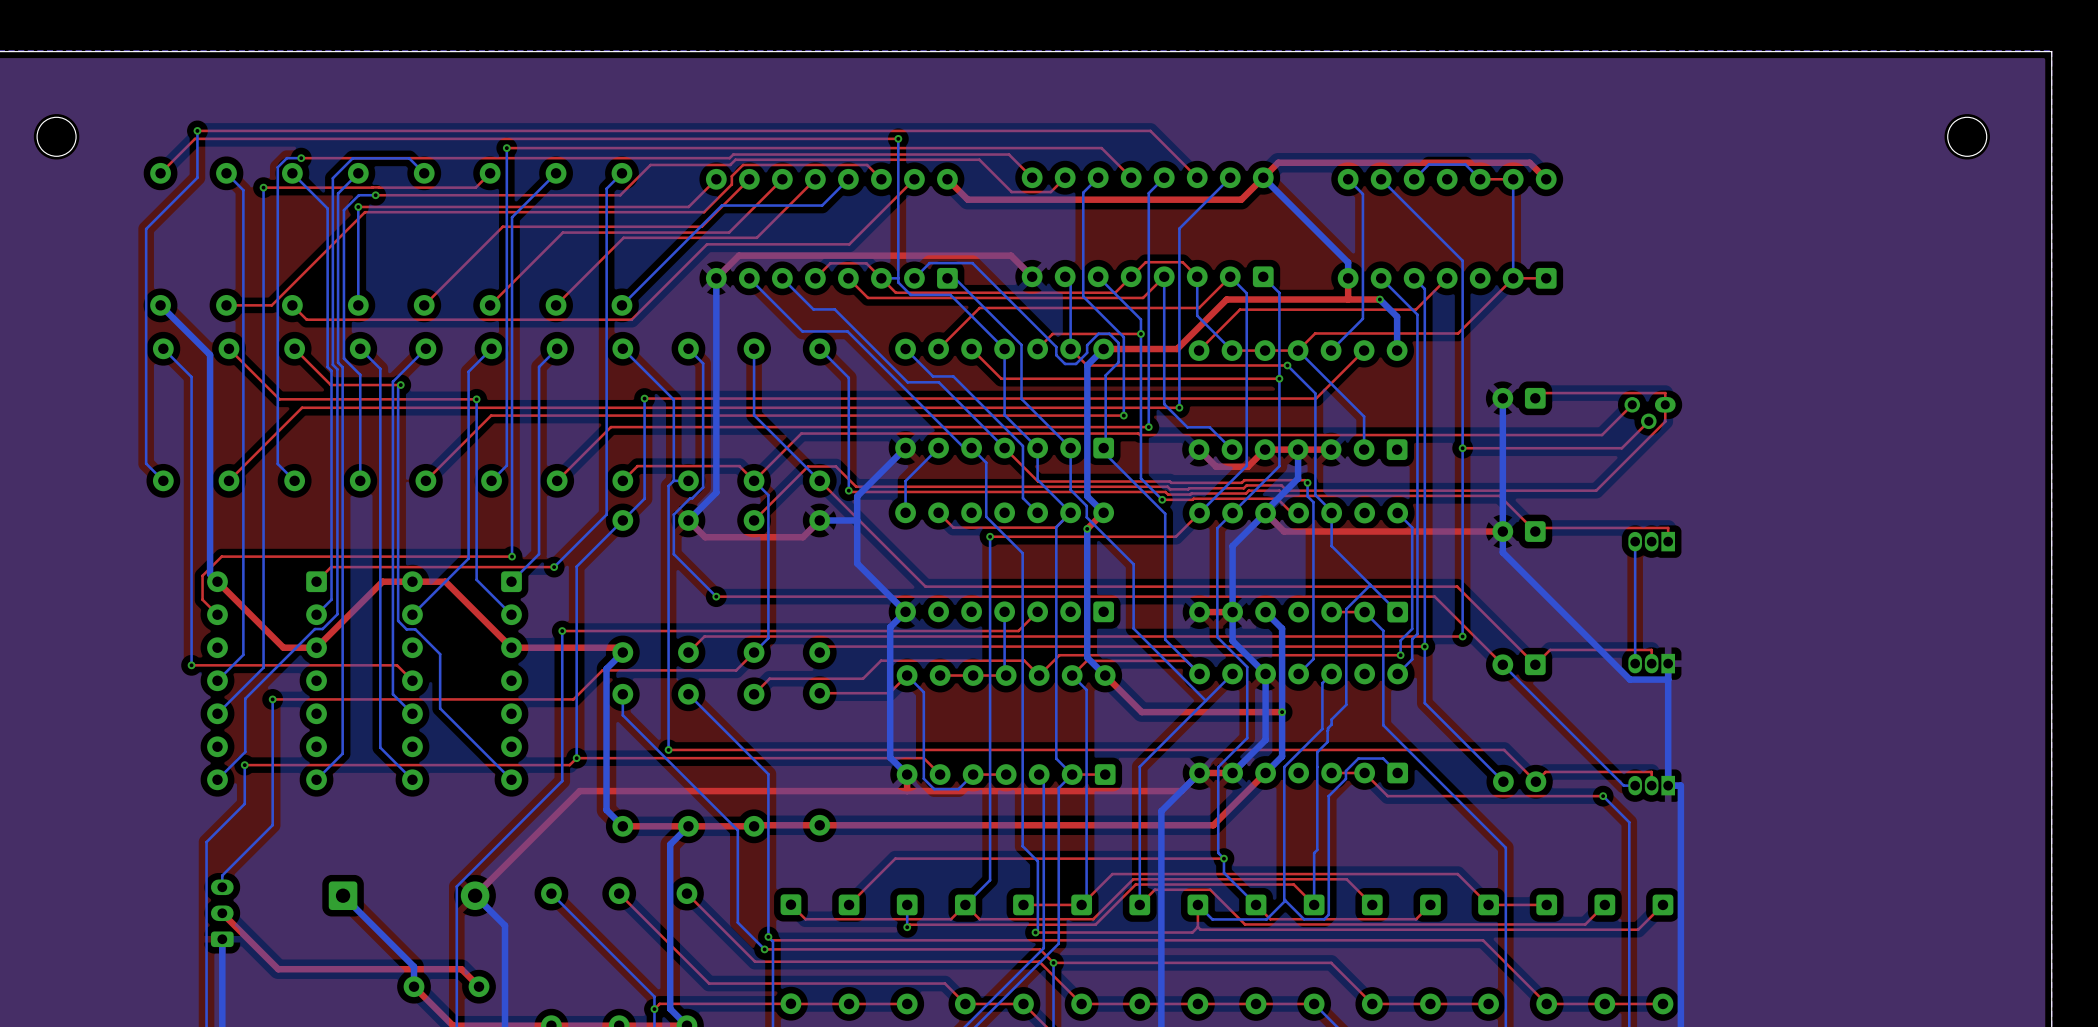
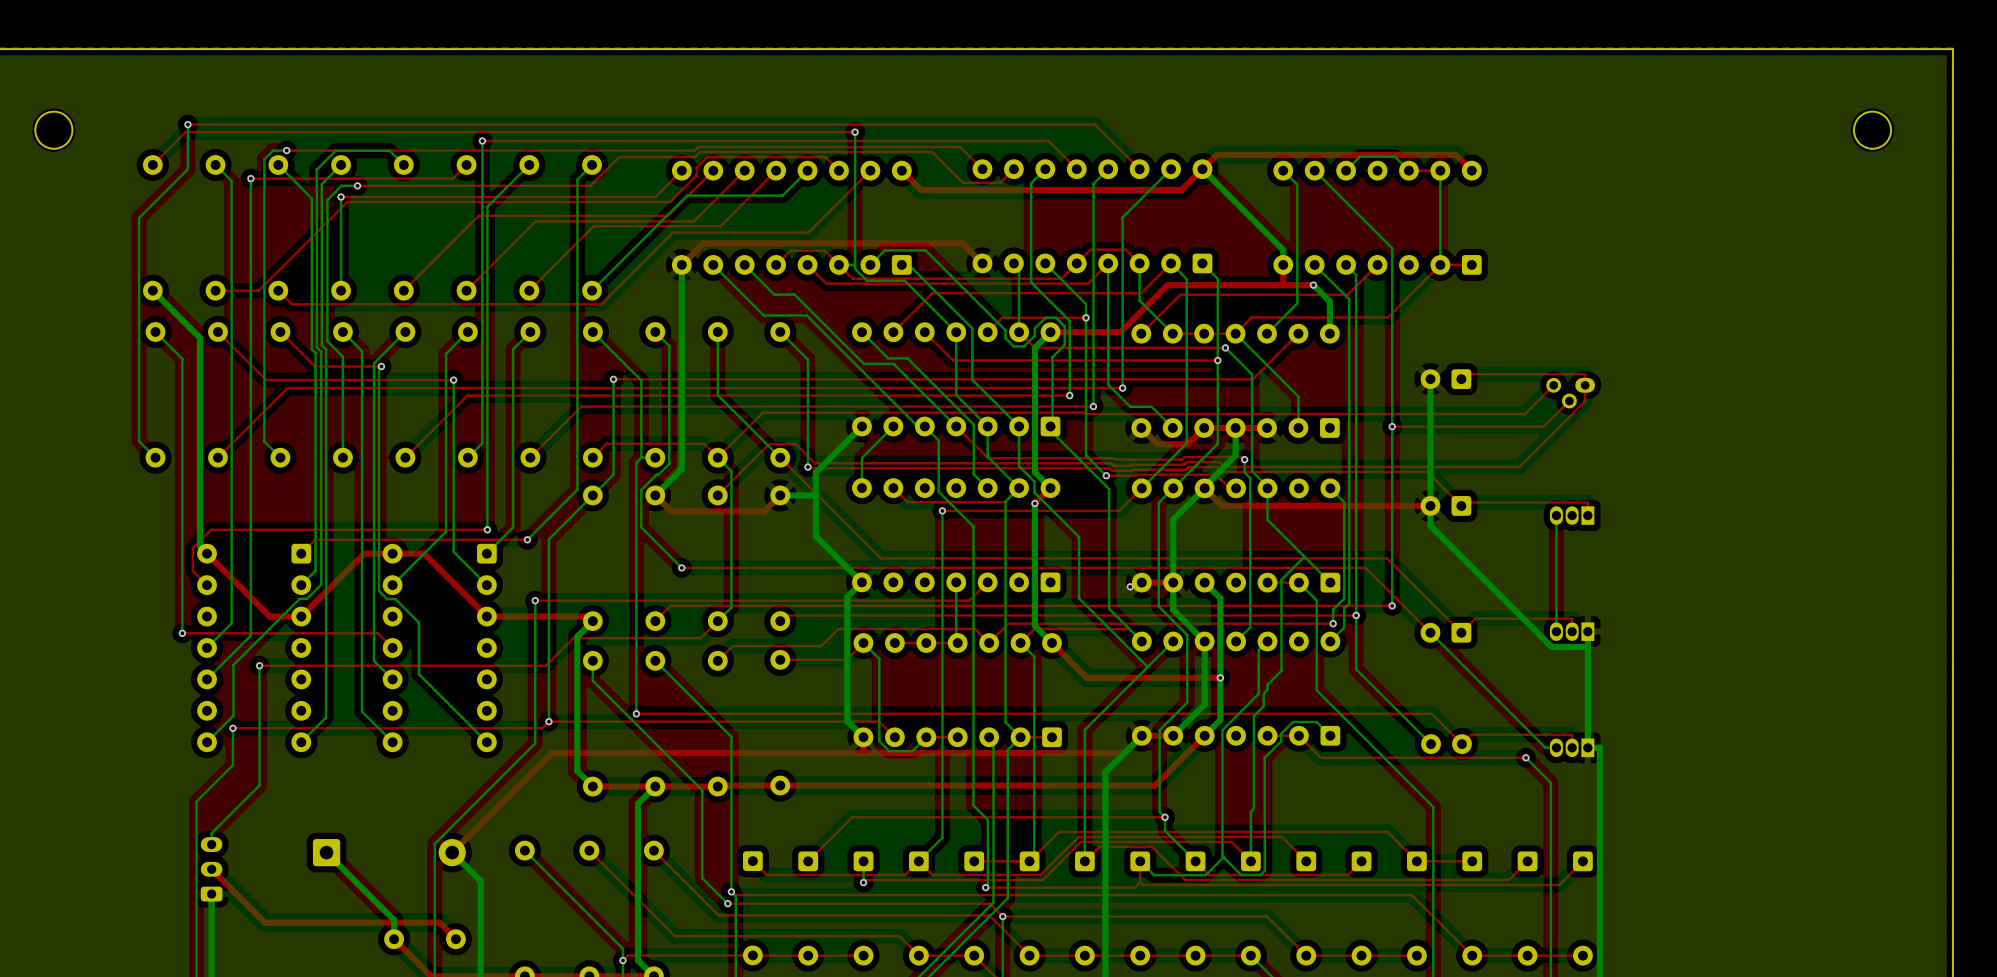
via: none -> (1130, 586)

